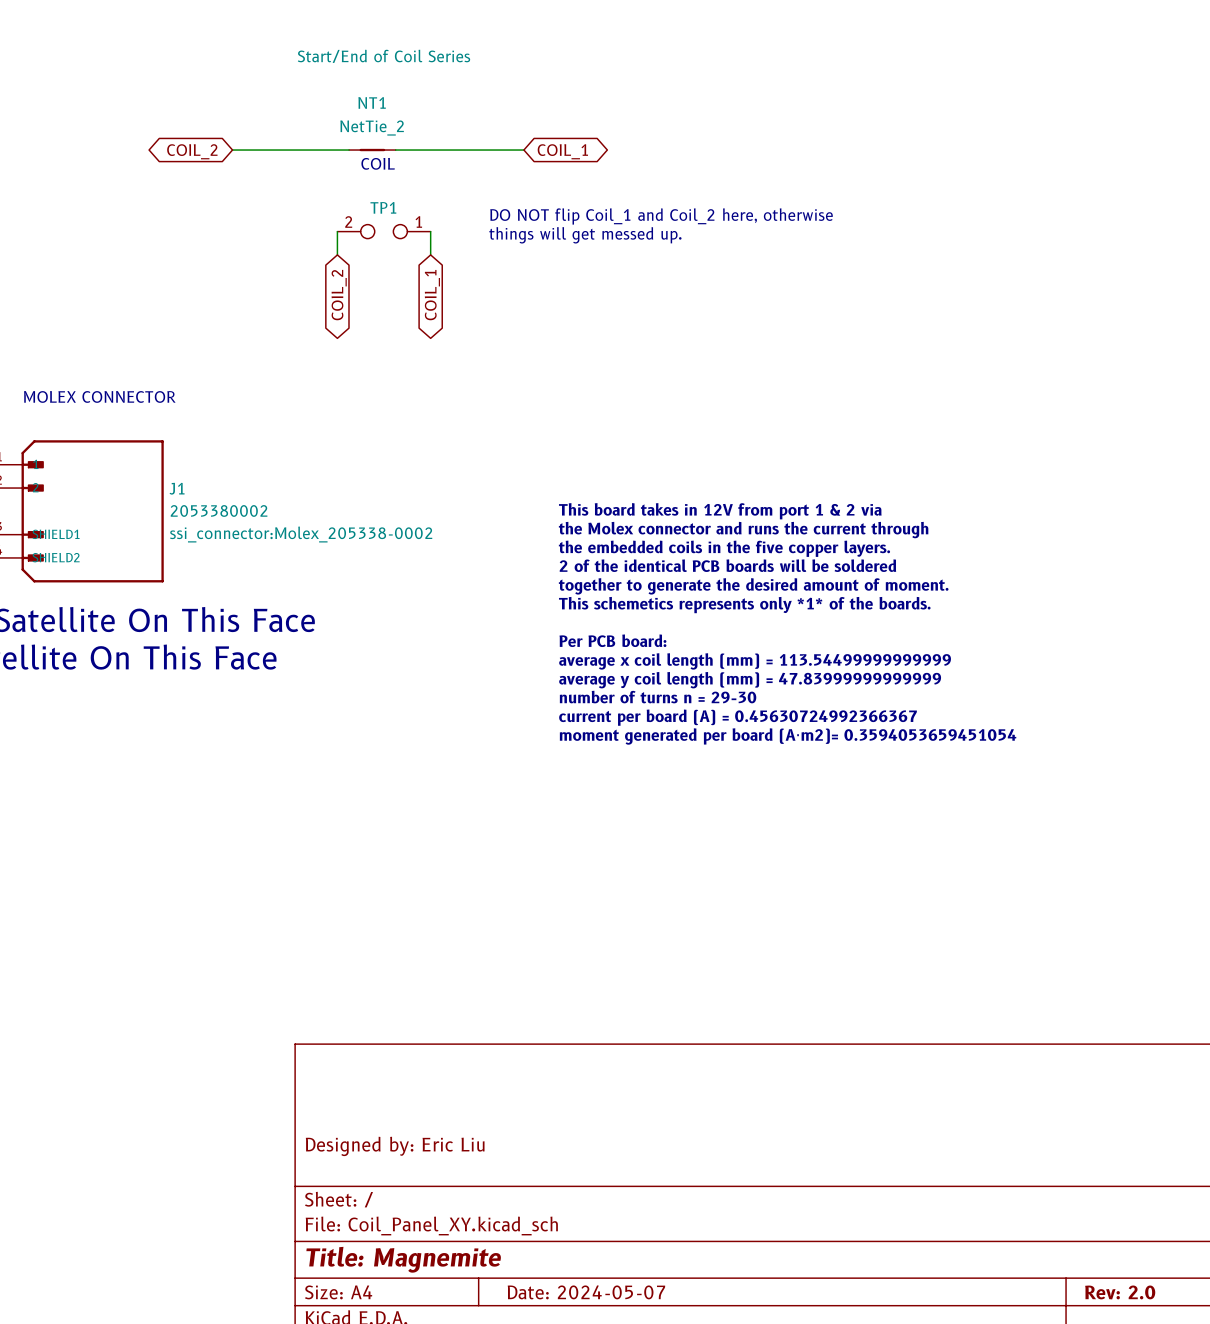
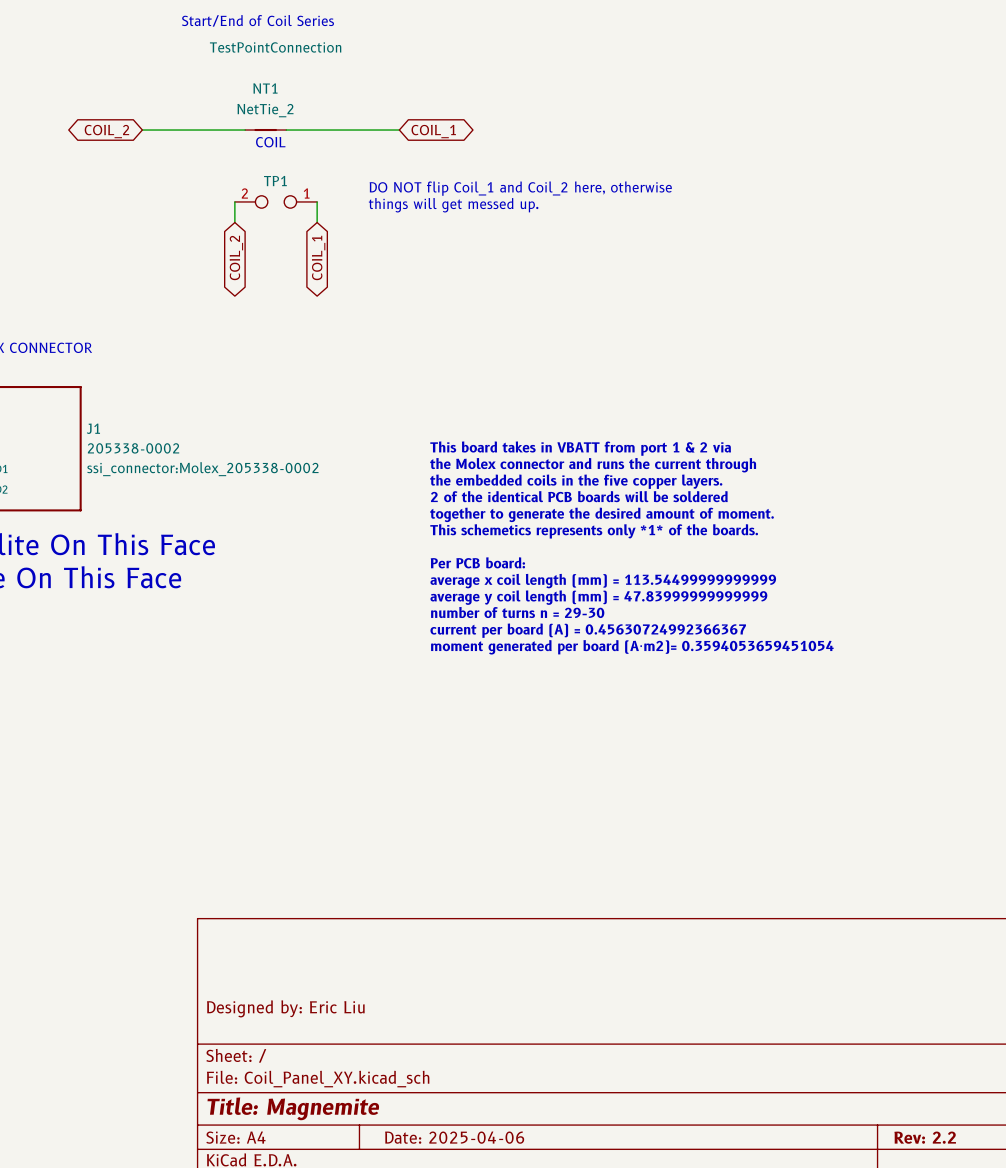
text: none -> Start/End of Coil Series (257, 20)
TP1 value: Start/End of Coil Series (383, 56) -> TestPointConnection (275, 47)
J1 value: 2053380002 (219, 510) -> 205338-0002 (133, 448)
text: This board takes in 12V from port 1 & 2 via (720, 511) -> This board takes in VBATT from port 1 & 2 via (580, 448)
title block: Date: 2024-05-07 (586, 1292) -> Date: 2025-04-06 (454, 1137)
title block: Rev: 2.0 (1120, 1292) -> Rev: 2.2 (925, 1137)

